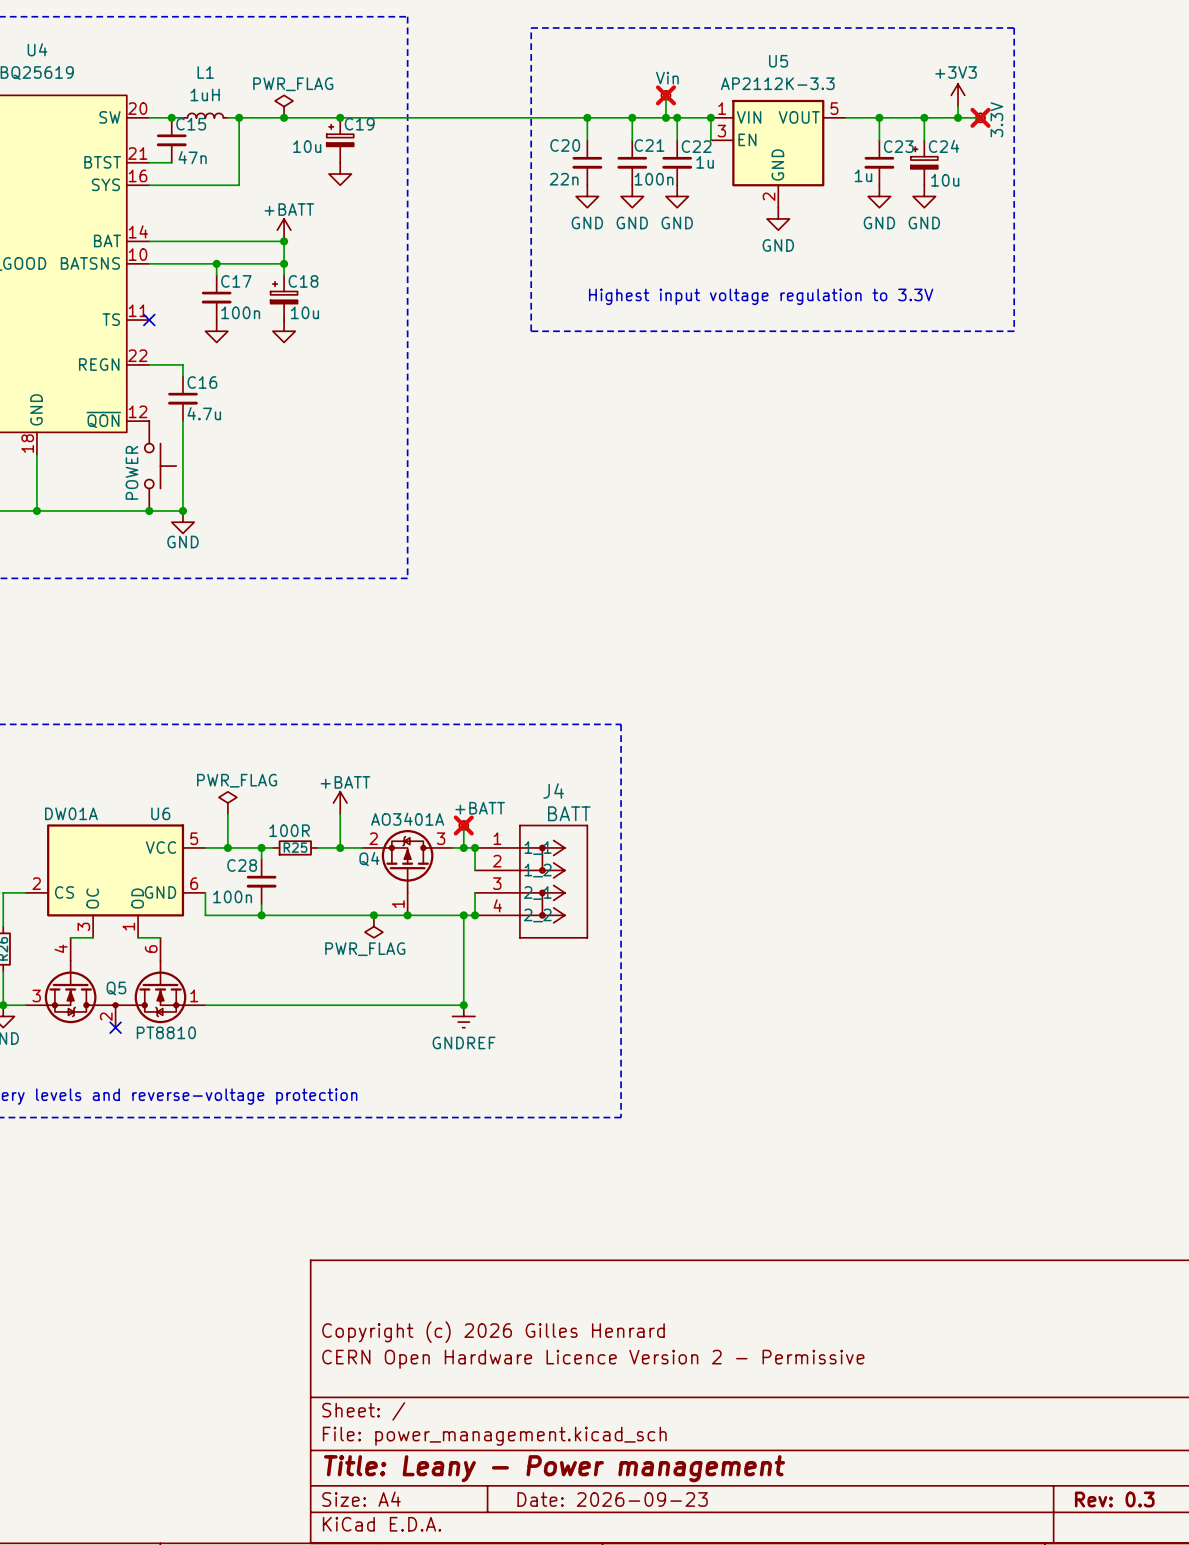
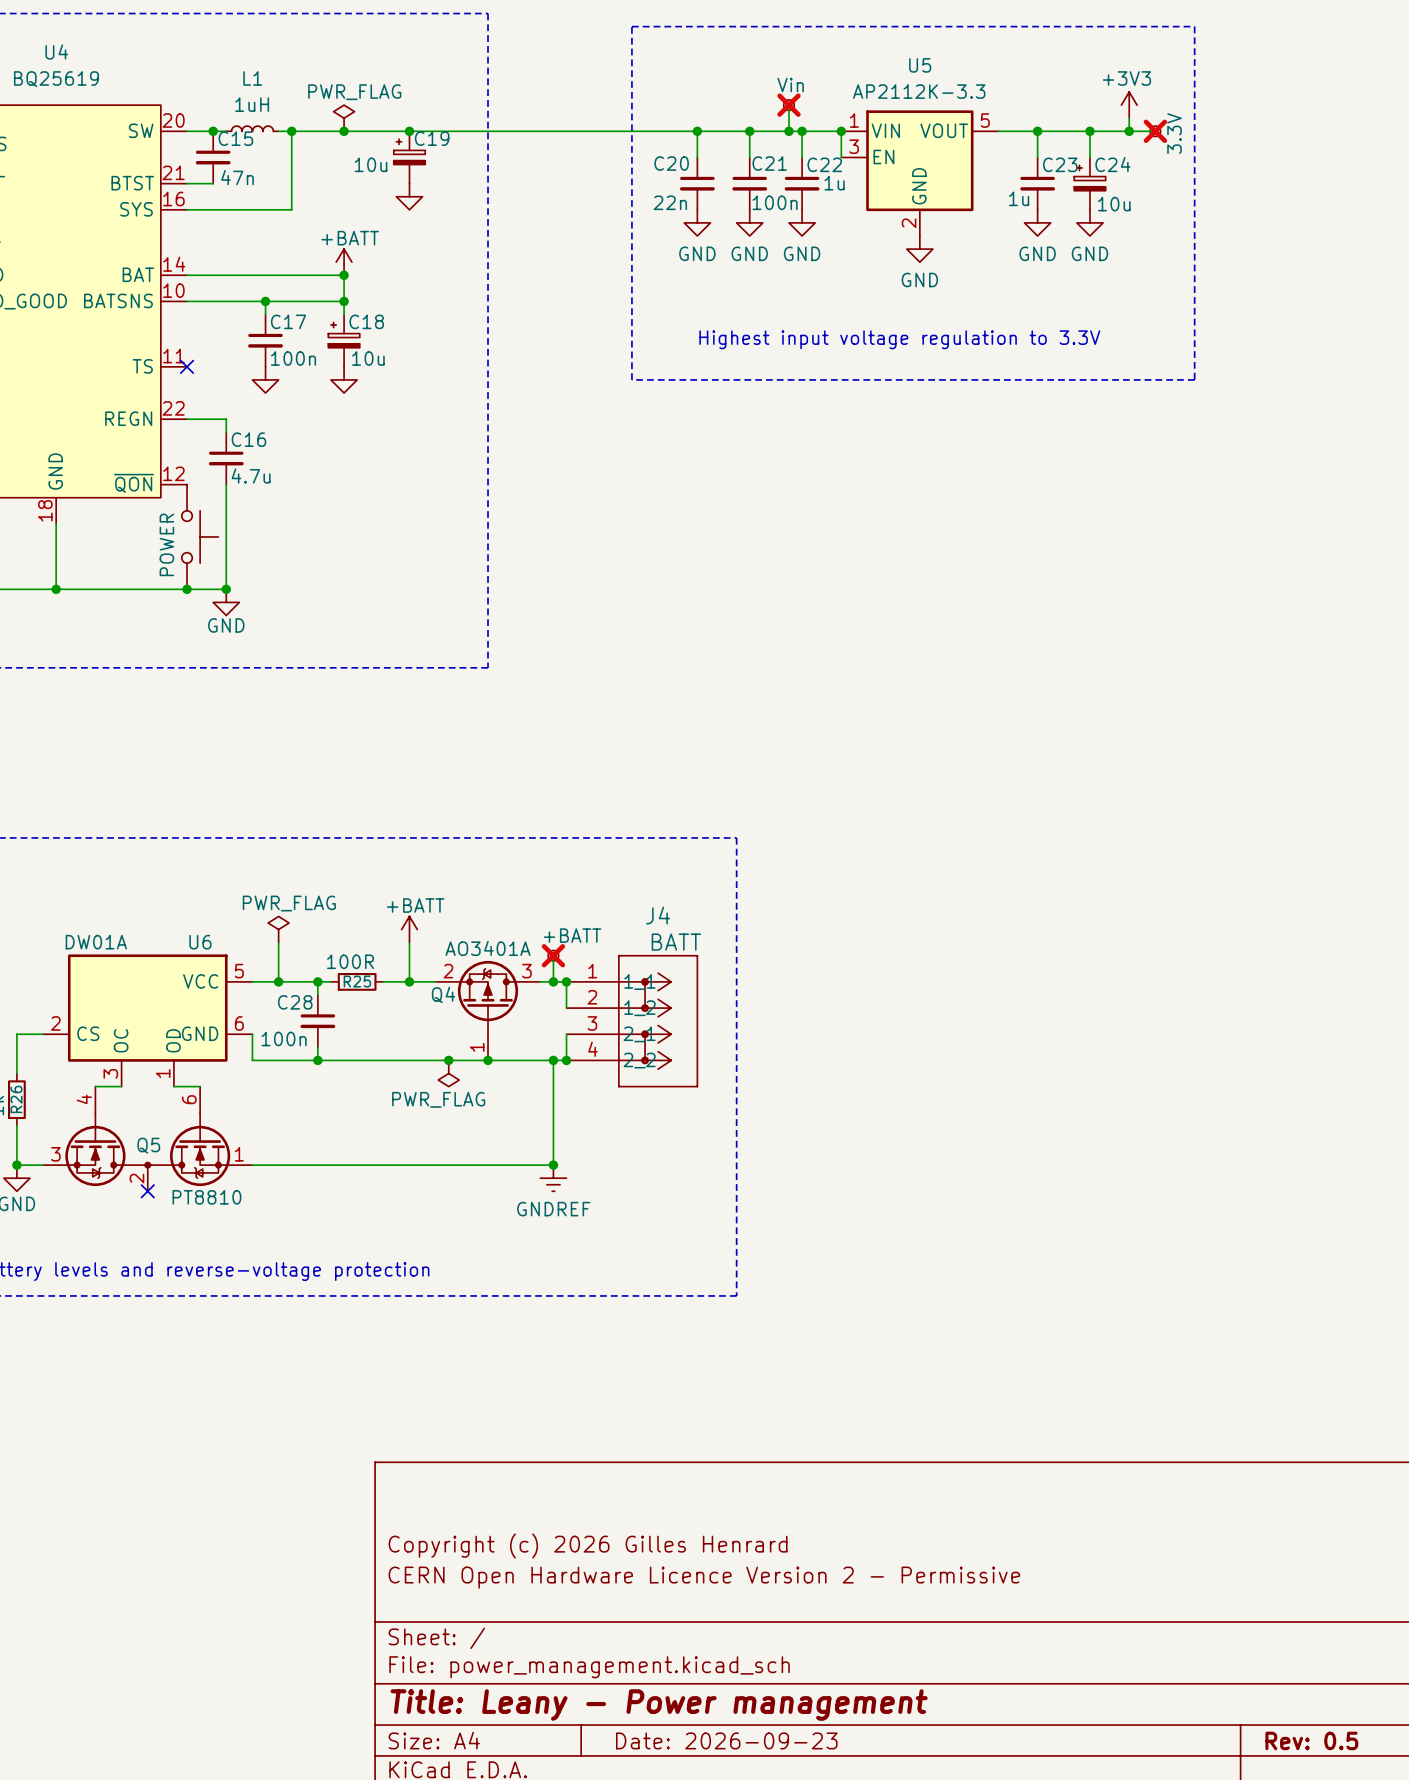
title block: Rev: 0.3 (1114, 1499) -> Rev: 0.5 (1311, 1740)

